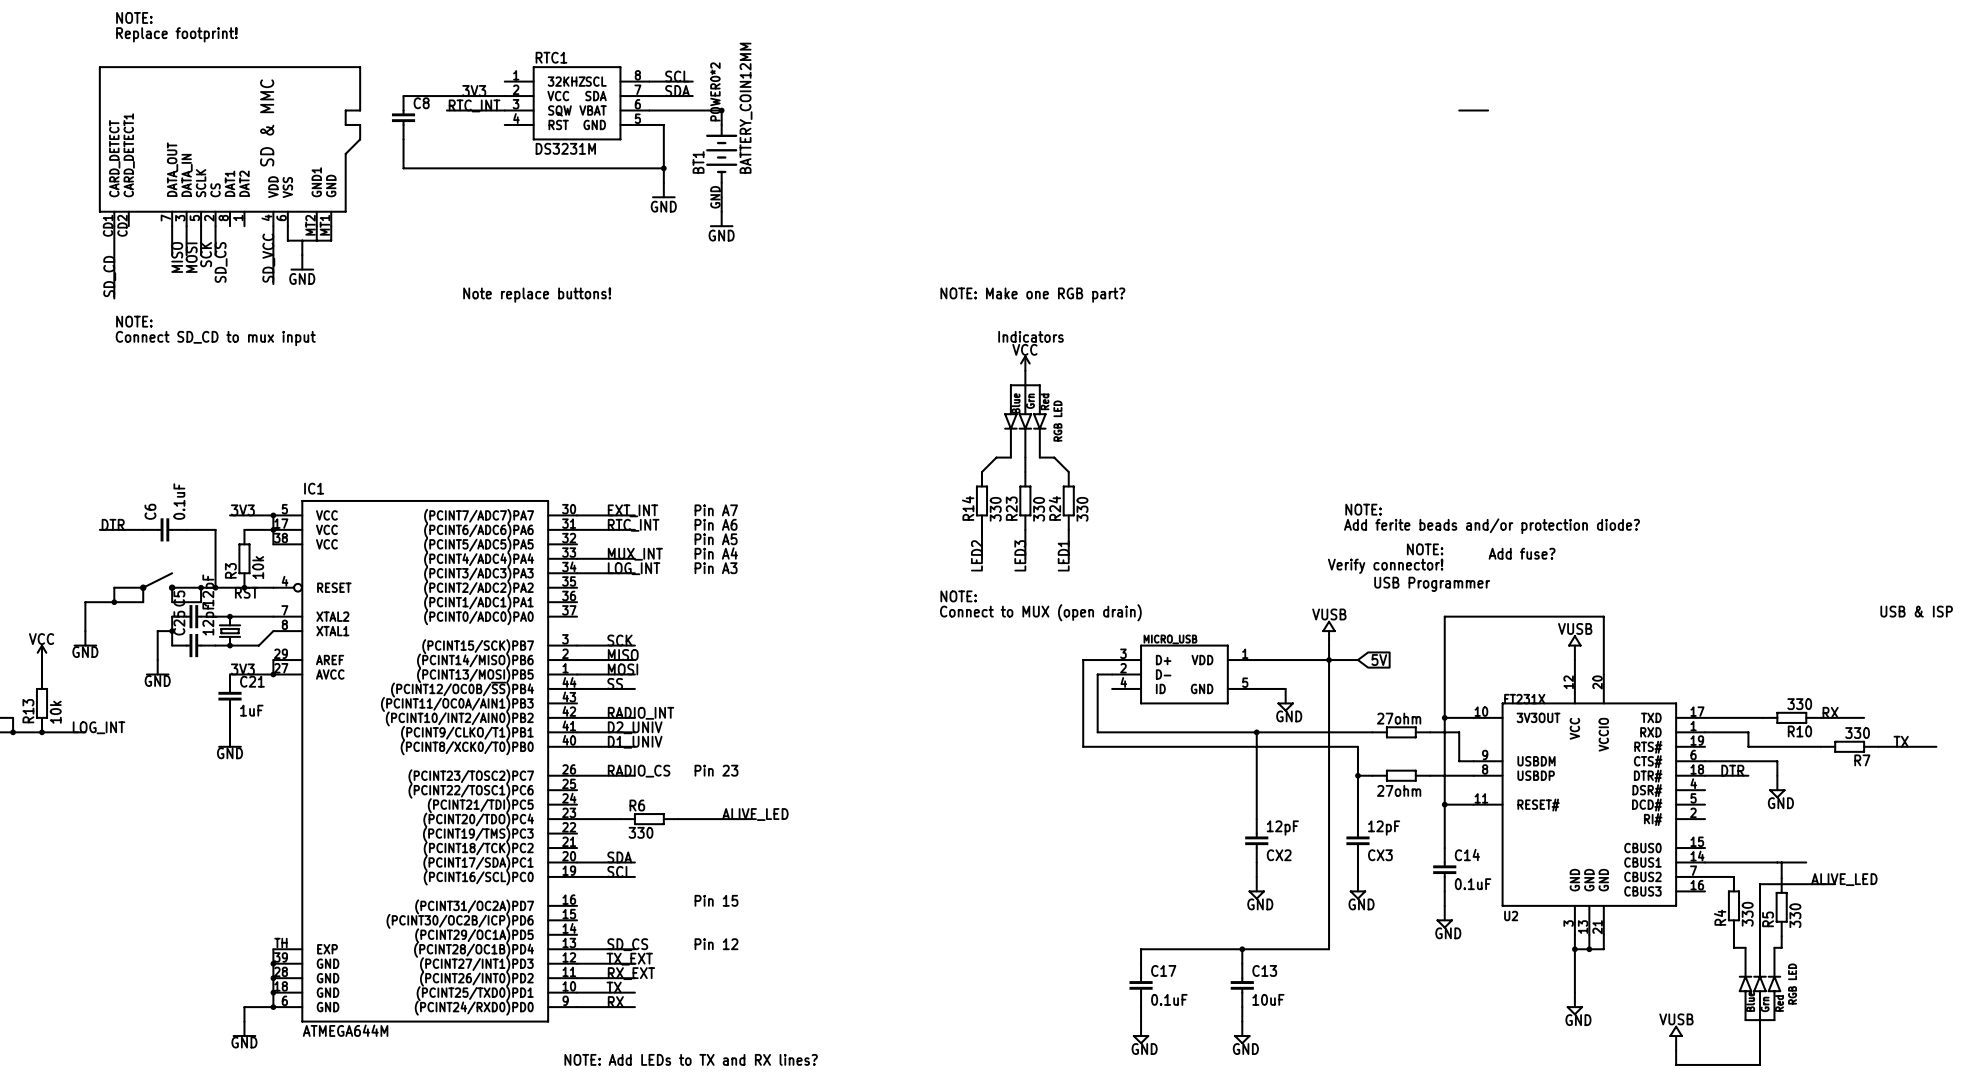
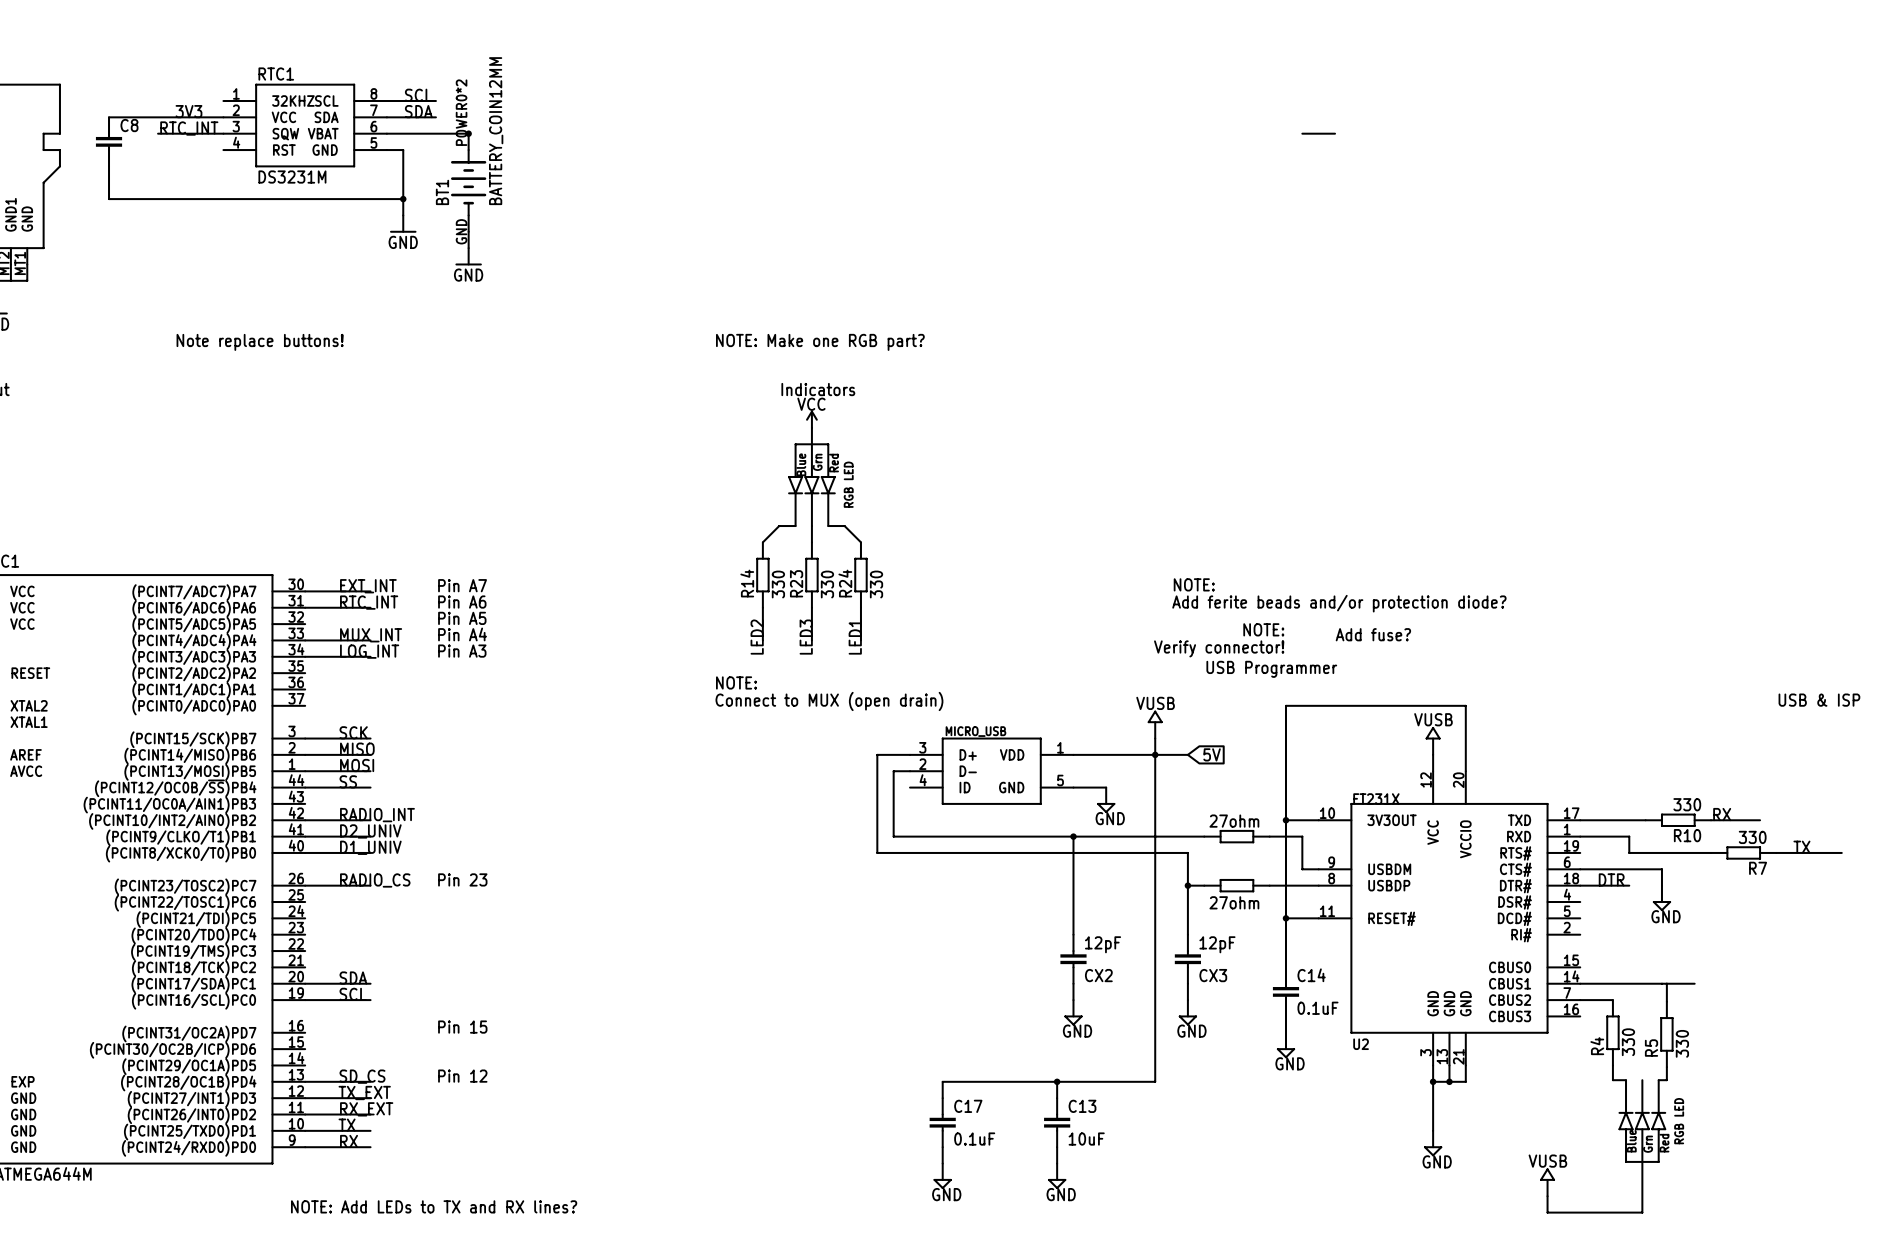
label: ALIVE_LED (755, 814) -> none
wire: (577, 819) (620, 819) -> none
R6: 330 (649, 819) -> none
wire: (678, 819) (750, 819) -> none
label: ALIVE_LED (1844, 879) -> none
wire: (1835, 884) (1760, 884) (1760, 947) -> none

